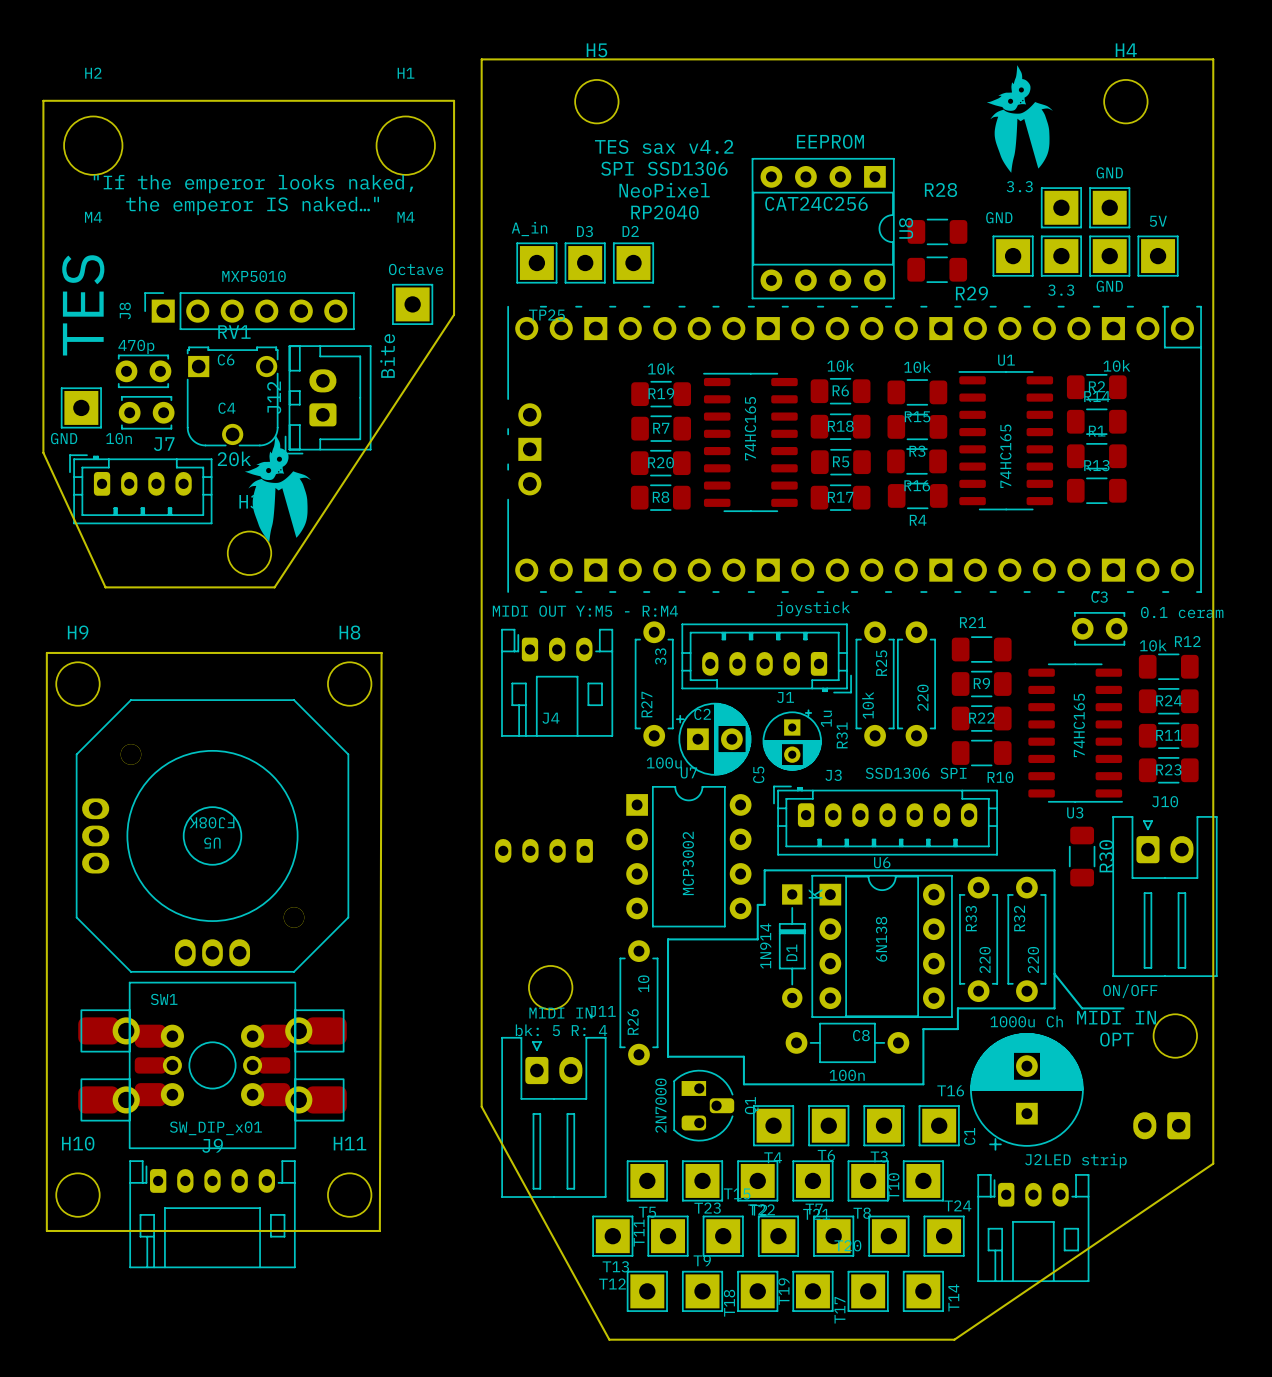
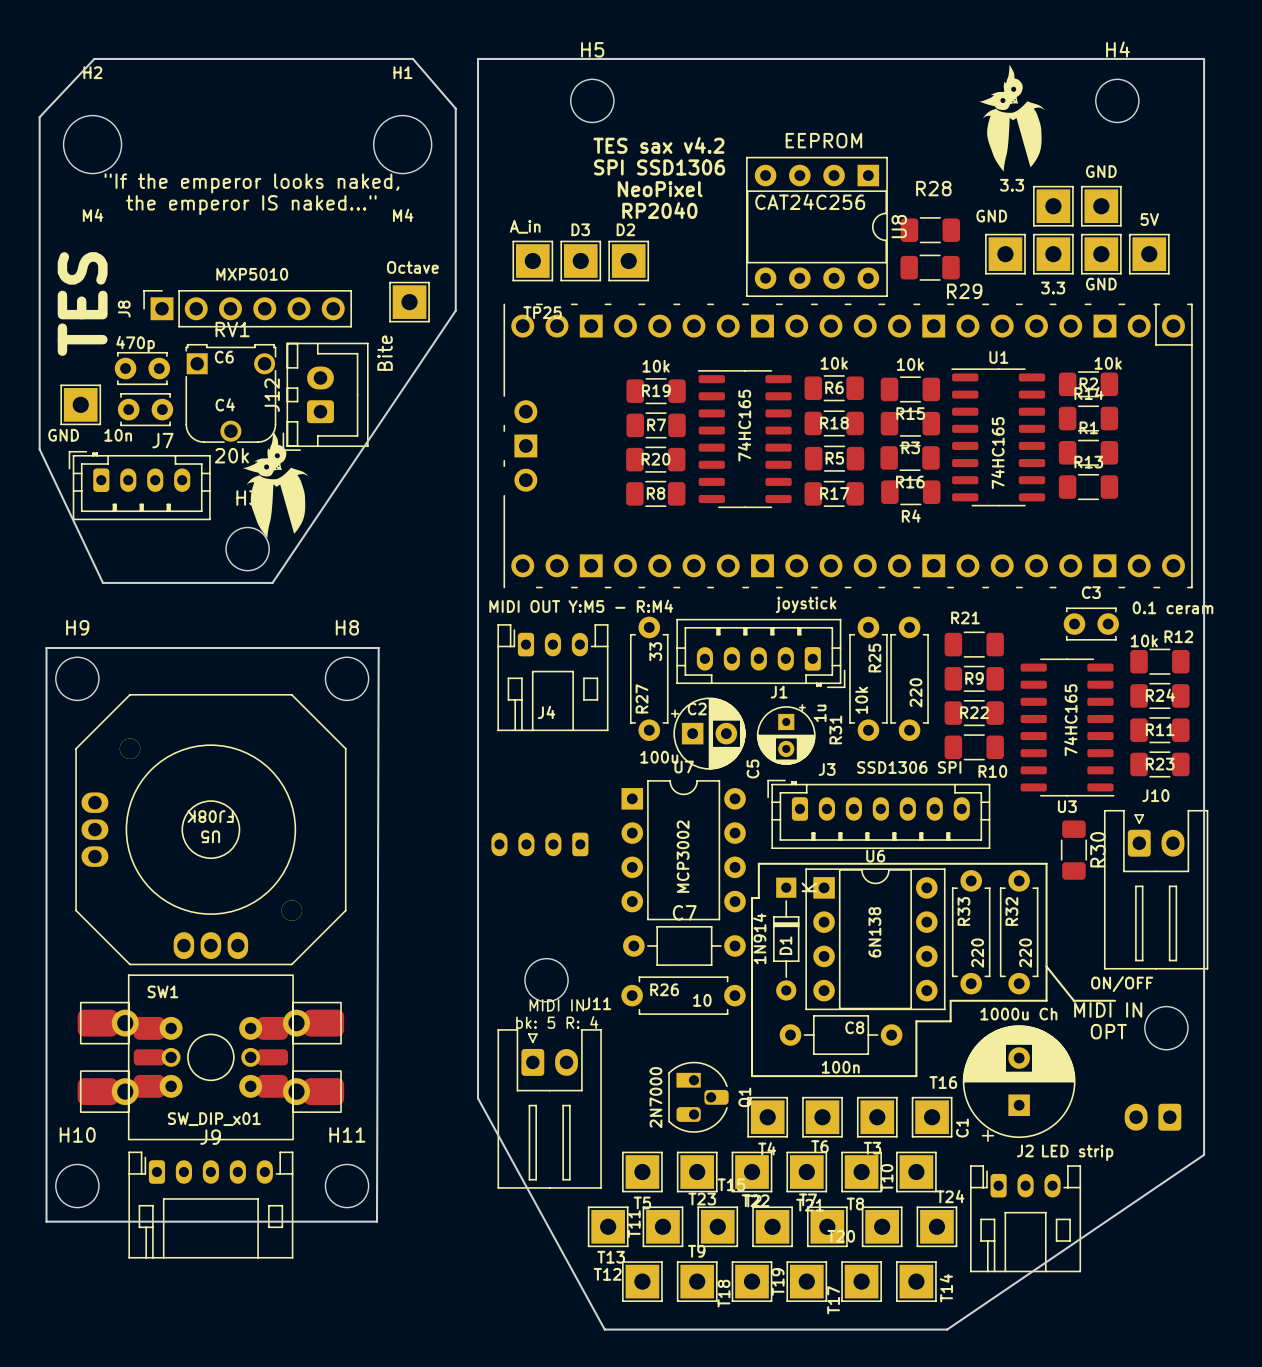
board edge: (105, 587) (43, 452) (43, 100) (454, 100) (454, 314) (274, 587) -> (104, 582) (103, 582) (39, 449) (39, 117) (94, 58) (412, 58) (455, 108) (455, 310) (272, 582)
line: (757, 939) (668, 939) (668, 1056) (743, 1056) (743, 1084) (757, 1084) -> (752, 932) (752, 1076)
C7: none -> (684, 945)
R26 rotation: 0° (638, 1002) -> 90° clockwise (683, 995)

